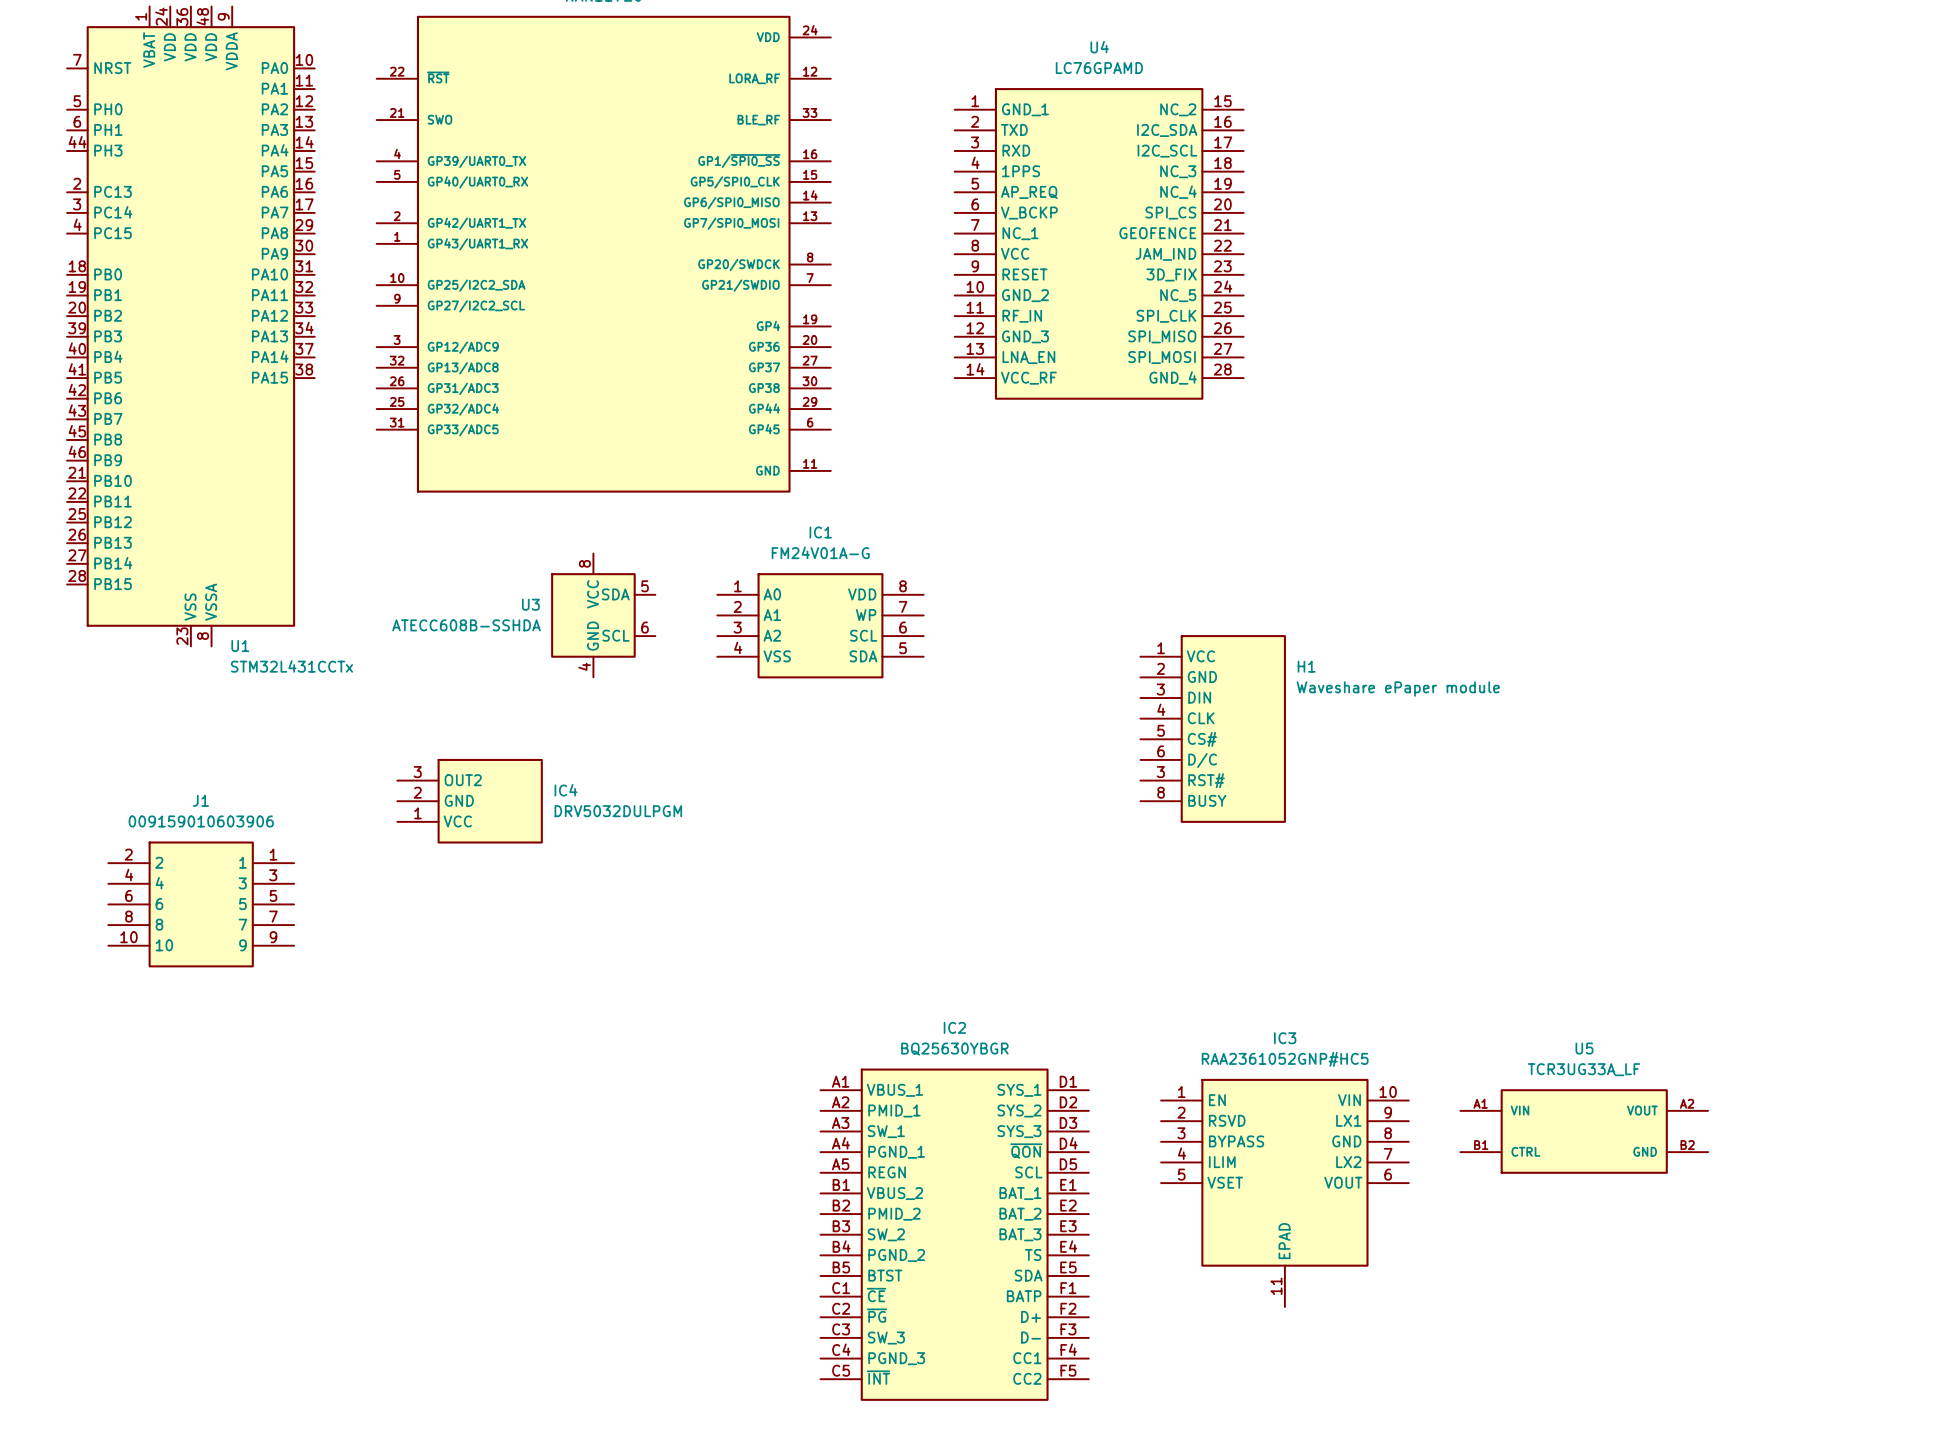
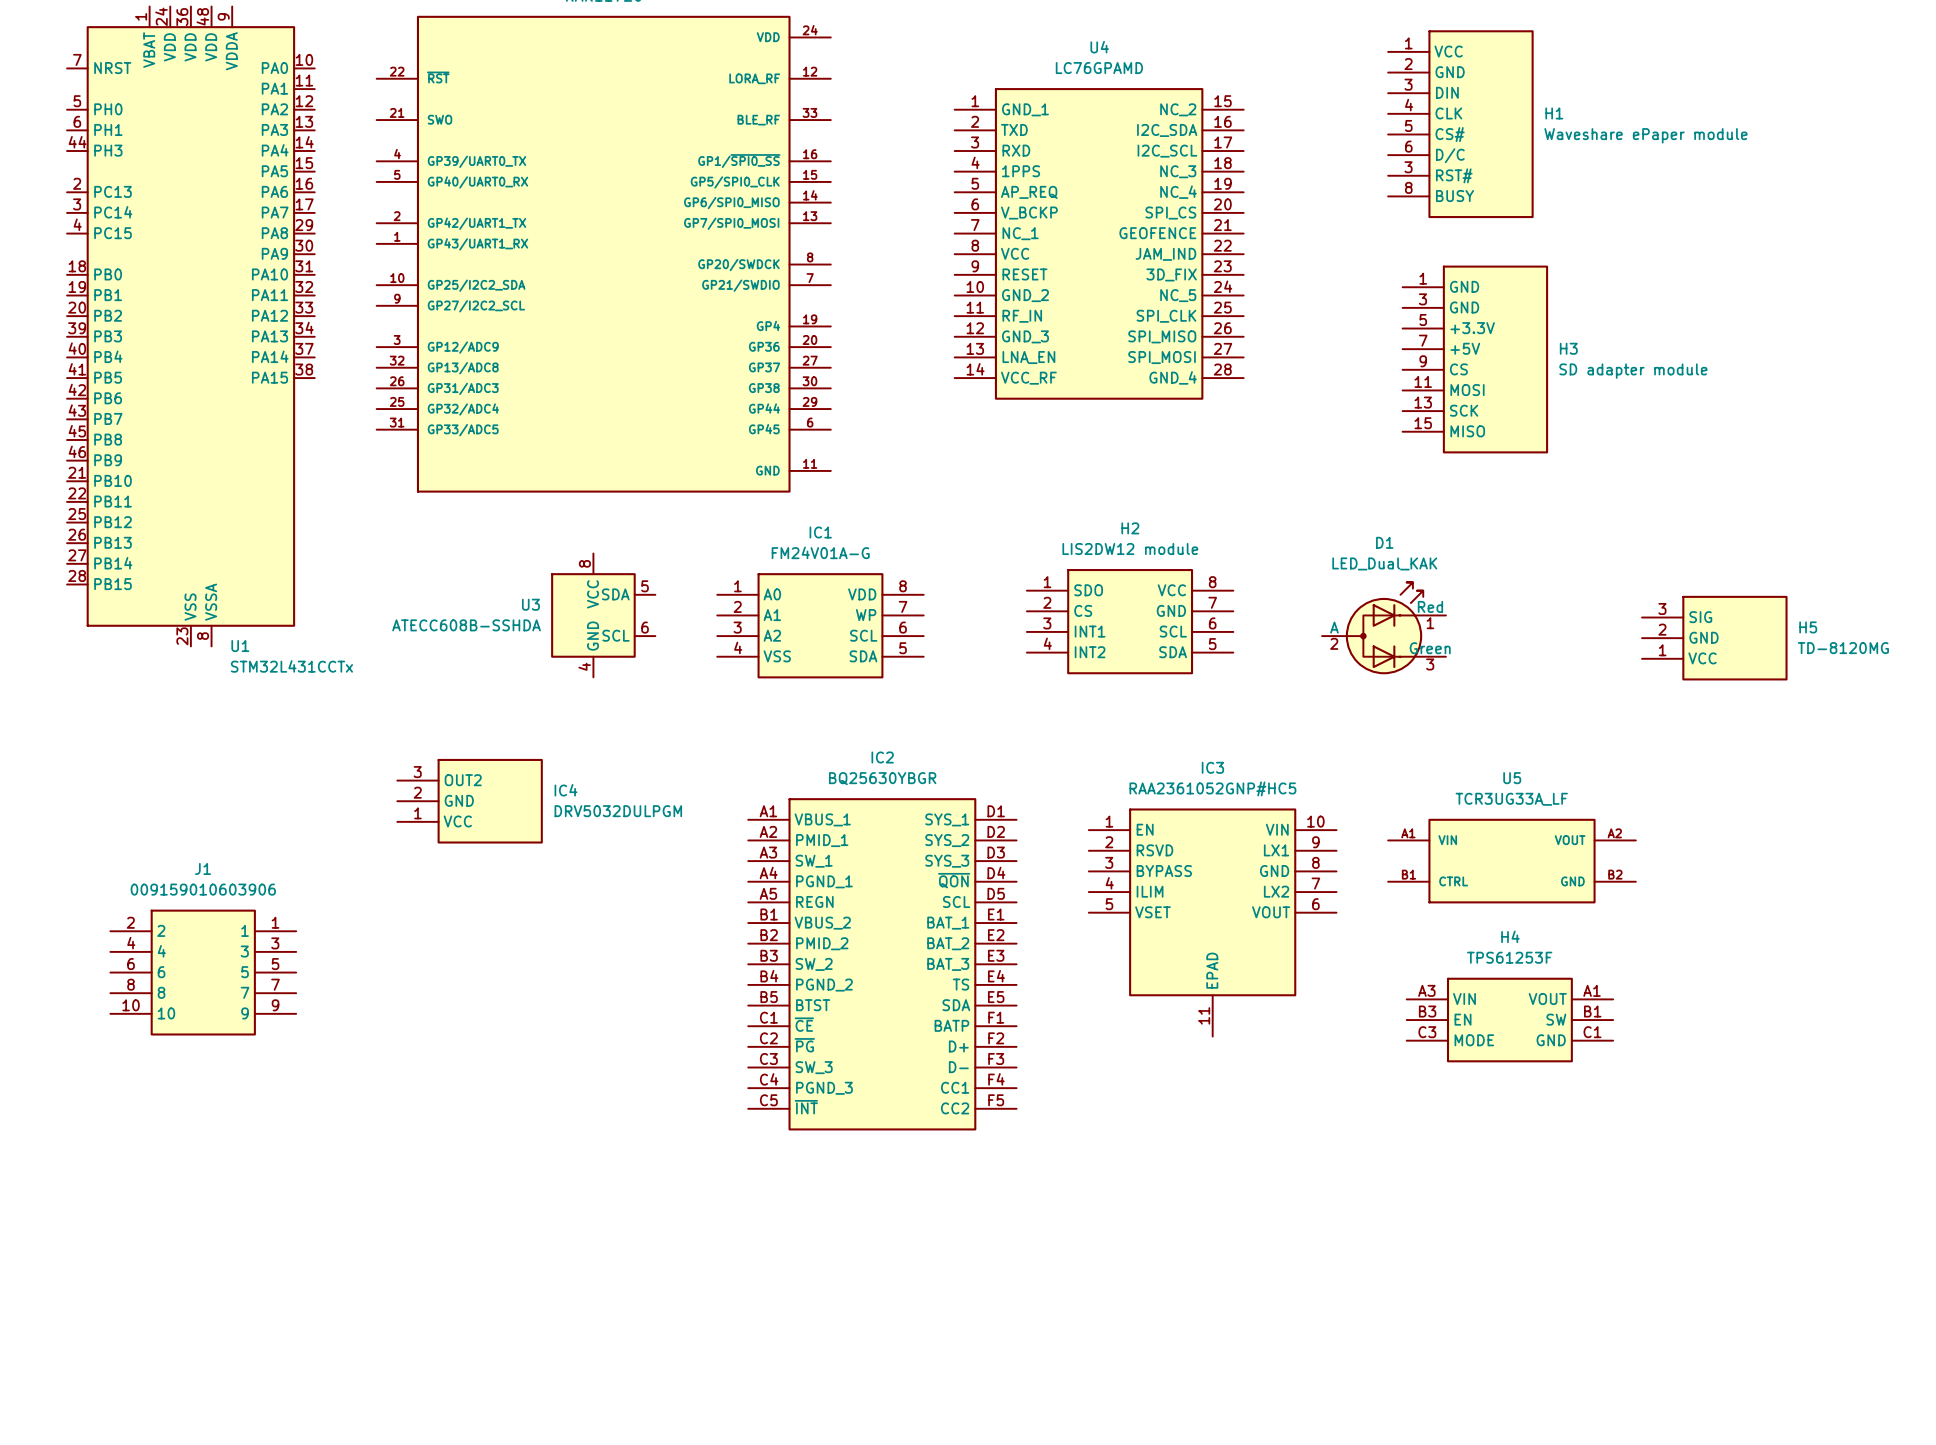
H3: none -> SD adapter module (1475, 359)
H2: none -> LIS2DW12 module (1130, 621)
D1: none -> LED_Dual_KAK (1384, 628)
H5: none -> TD-8120MG (1714, 638)
H1 name position: H1 (1306, 666) -> H1 (1554, 113)
H1 value position: Waveshare ePaper module (1398, 689) -> Waveshare ePaper module (1646, 135)
H1 position: (1213, 728) -> (1460, 124)
J1 position: (201, 904) -> (203, 972)
H4: none -> TPS61253F (1509, 1020)
U5 position: (1584, 1131) -> (1511, 861)
IC3 position: (1284, 1192) -> (1212, 922)
IC2 position: (954, 1234) -> (882, 964)

